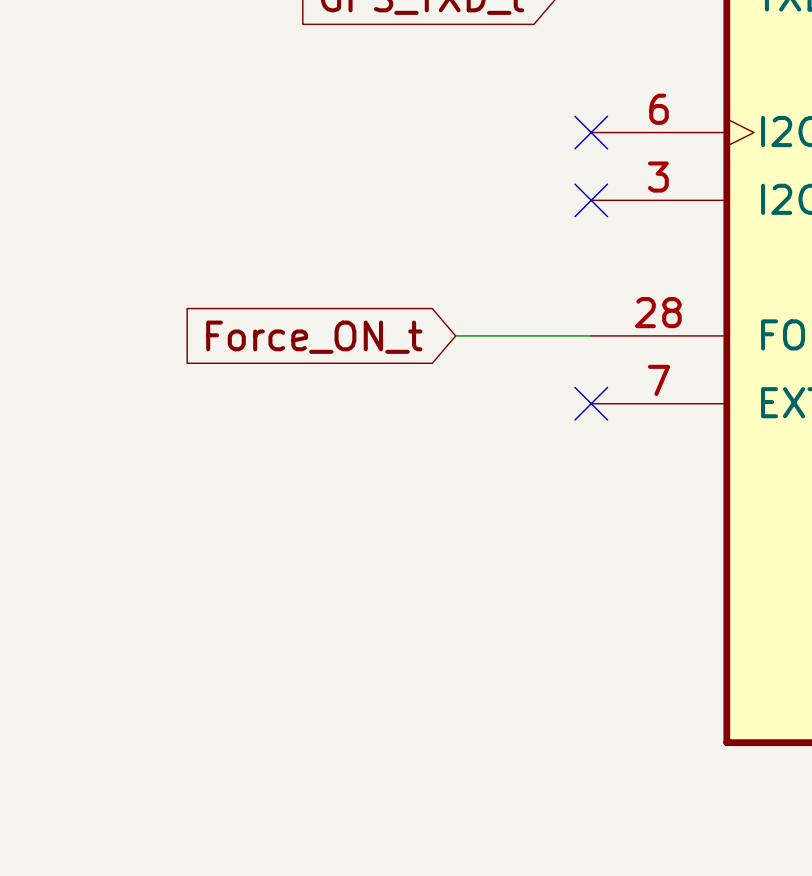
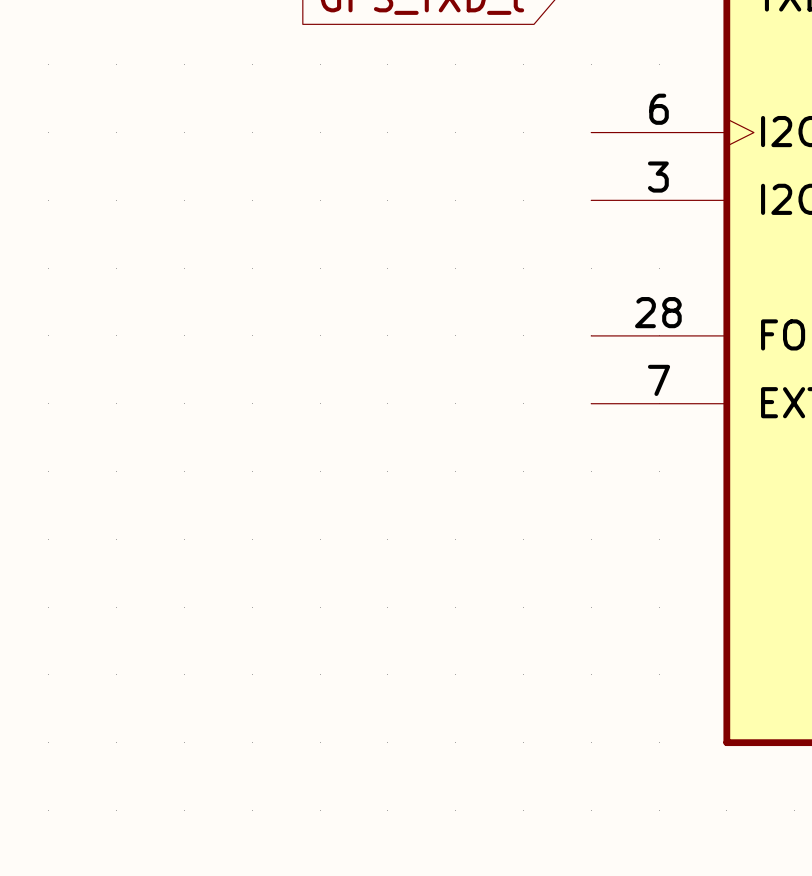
no-connect mark: (591, 132) -> none
no-connect mark: (591, 200) -> none
wire: (455, 335) (591, 335) -> none
global label: Force_ON_t (314, 337) -> none
no-connect mark: (591, 403) -> none

